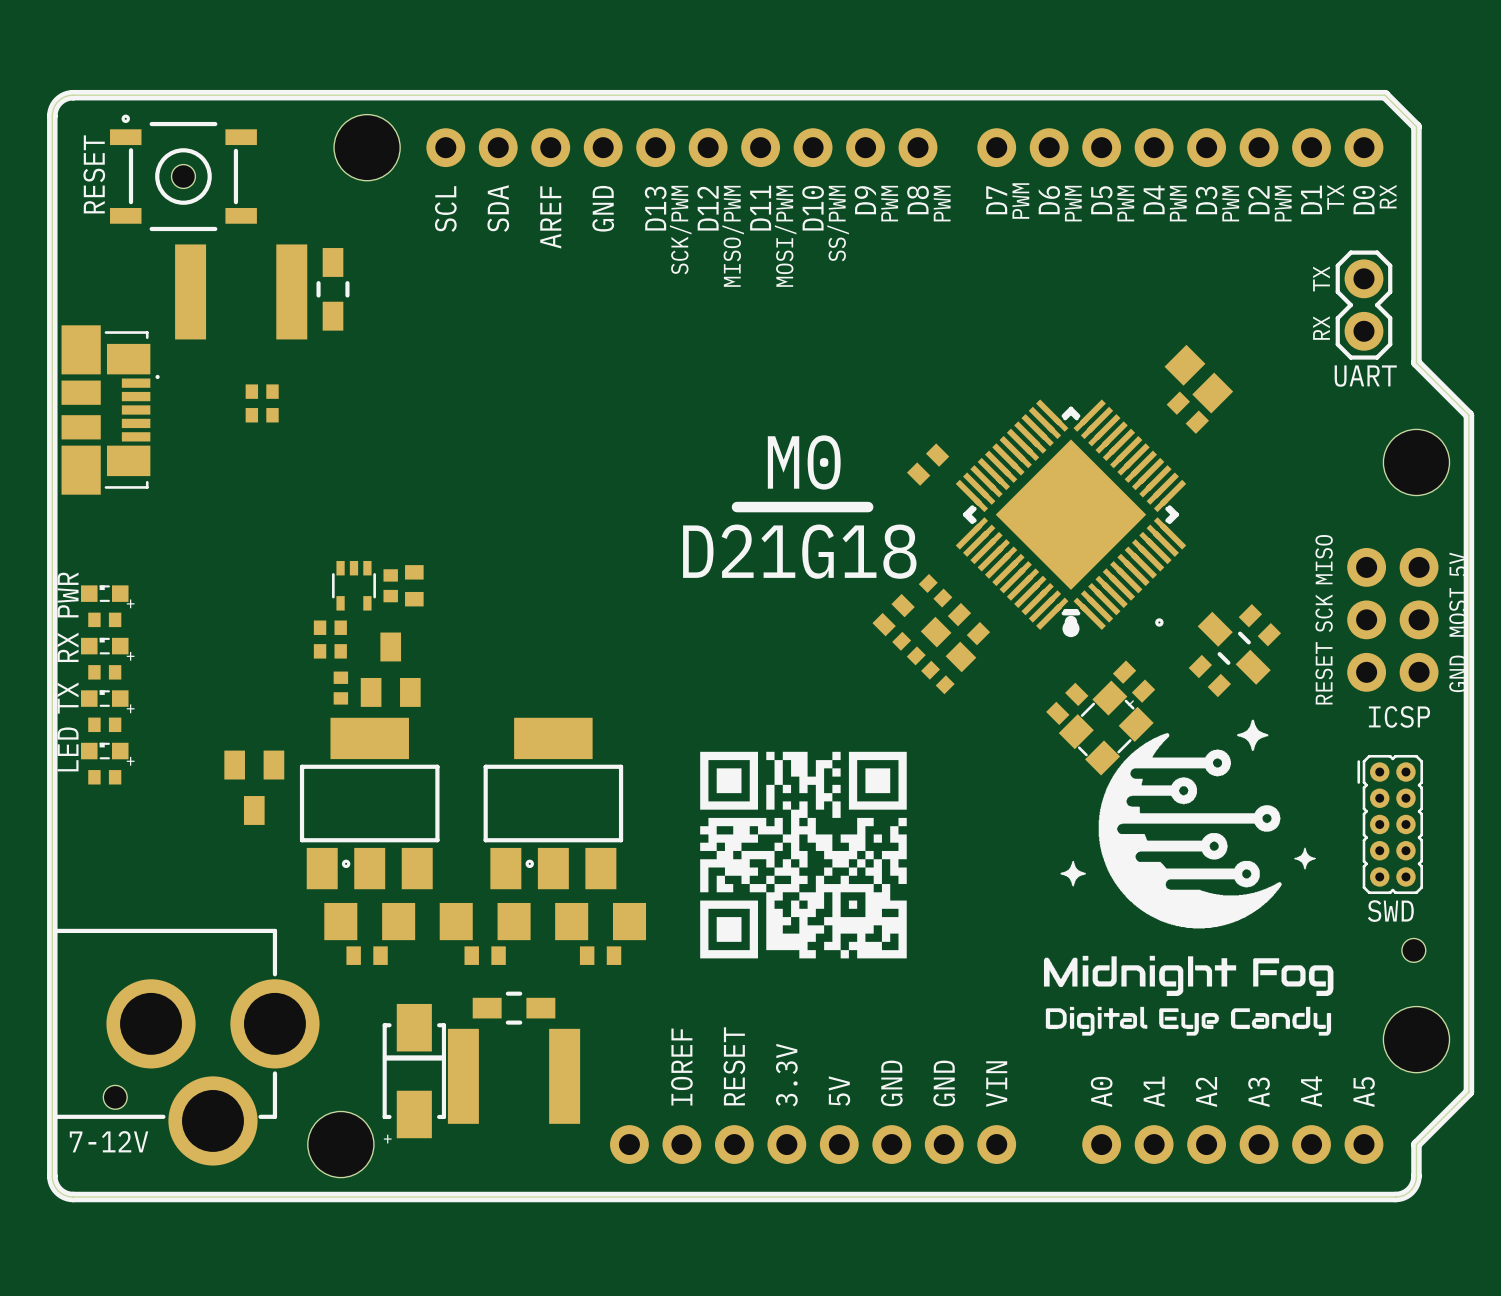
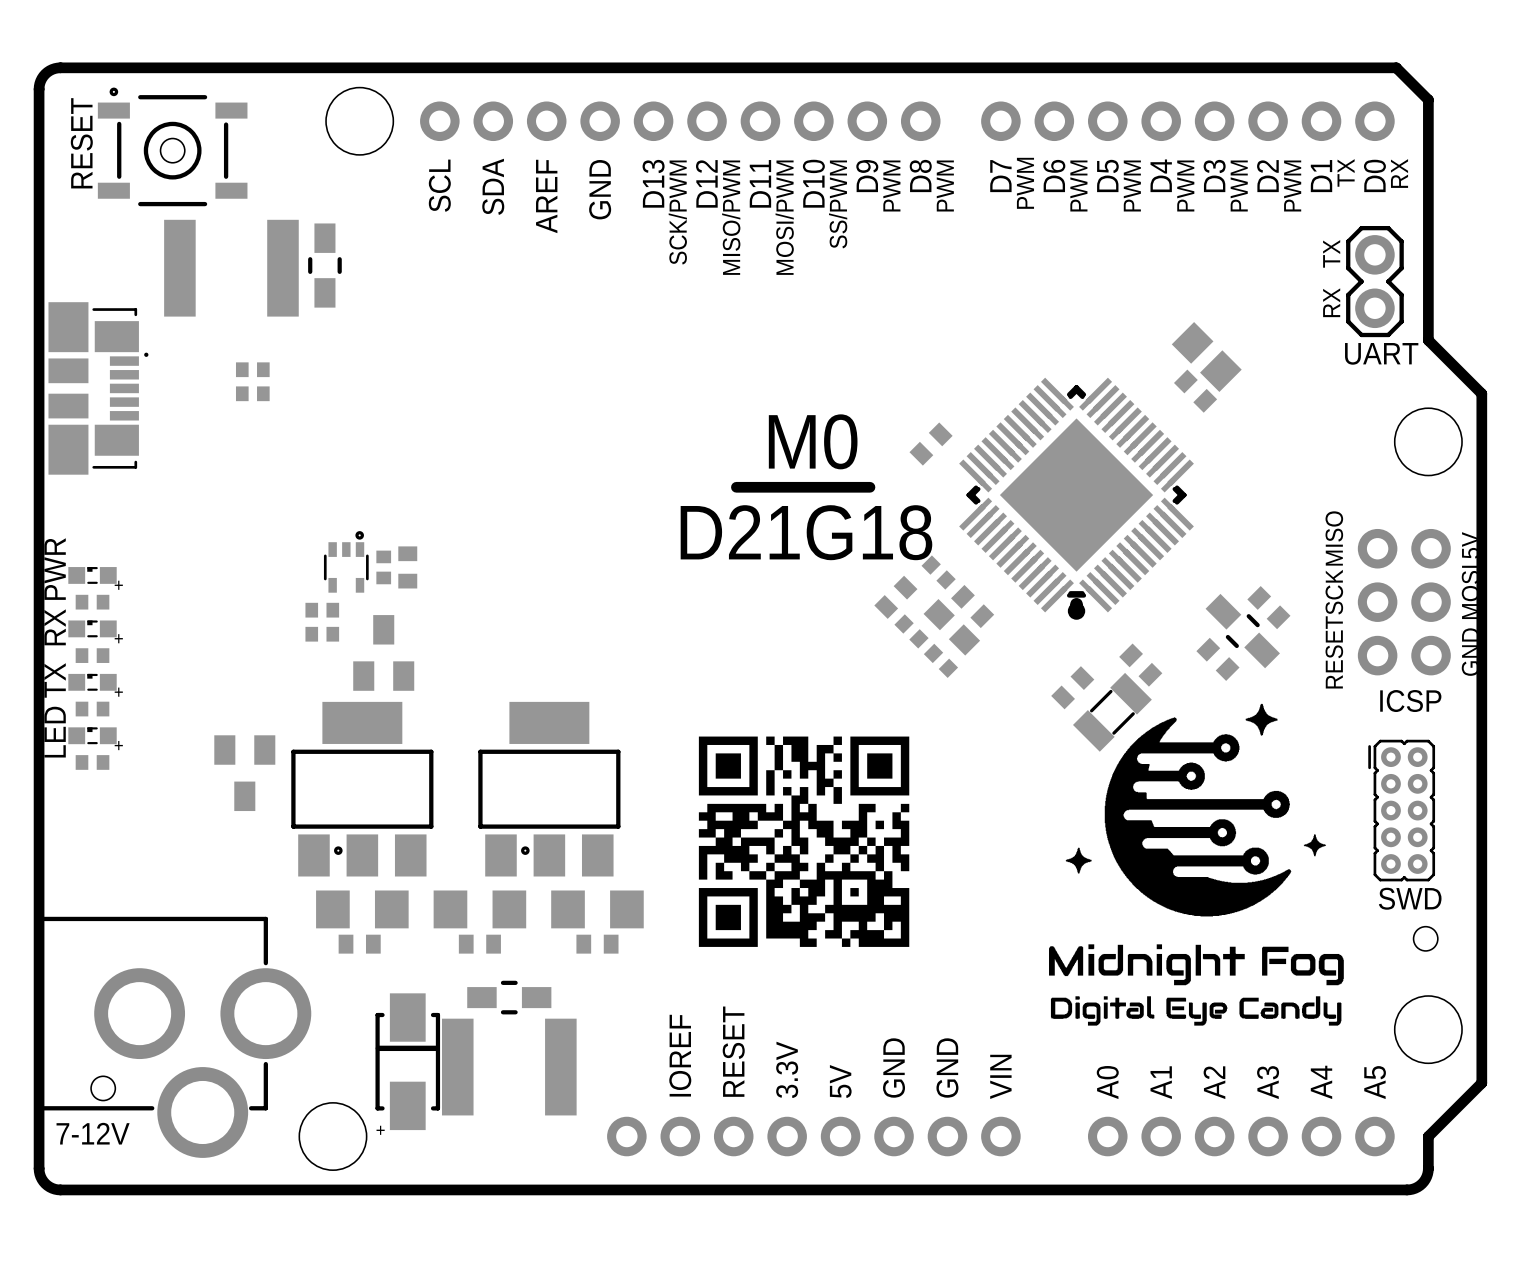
drawing: none -> [355, 531, 364, 540]
drawing: [1155, 618, 1164, 627] -> none
part footprint: [1058, 680, 1154, 776] -> [1073, 672, 1152, 752]
part: (340, 688) -> none

